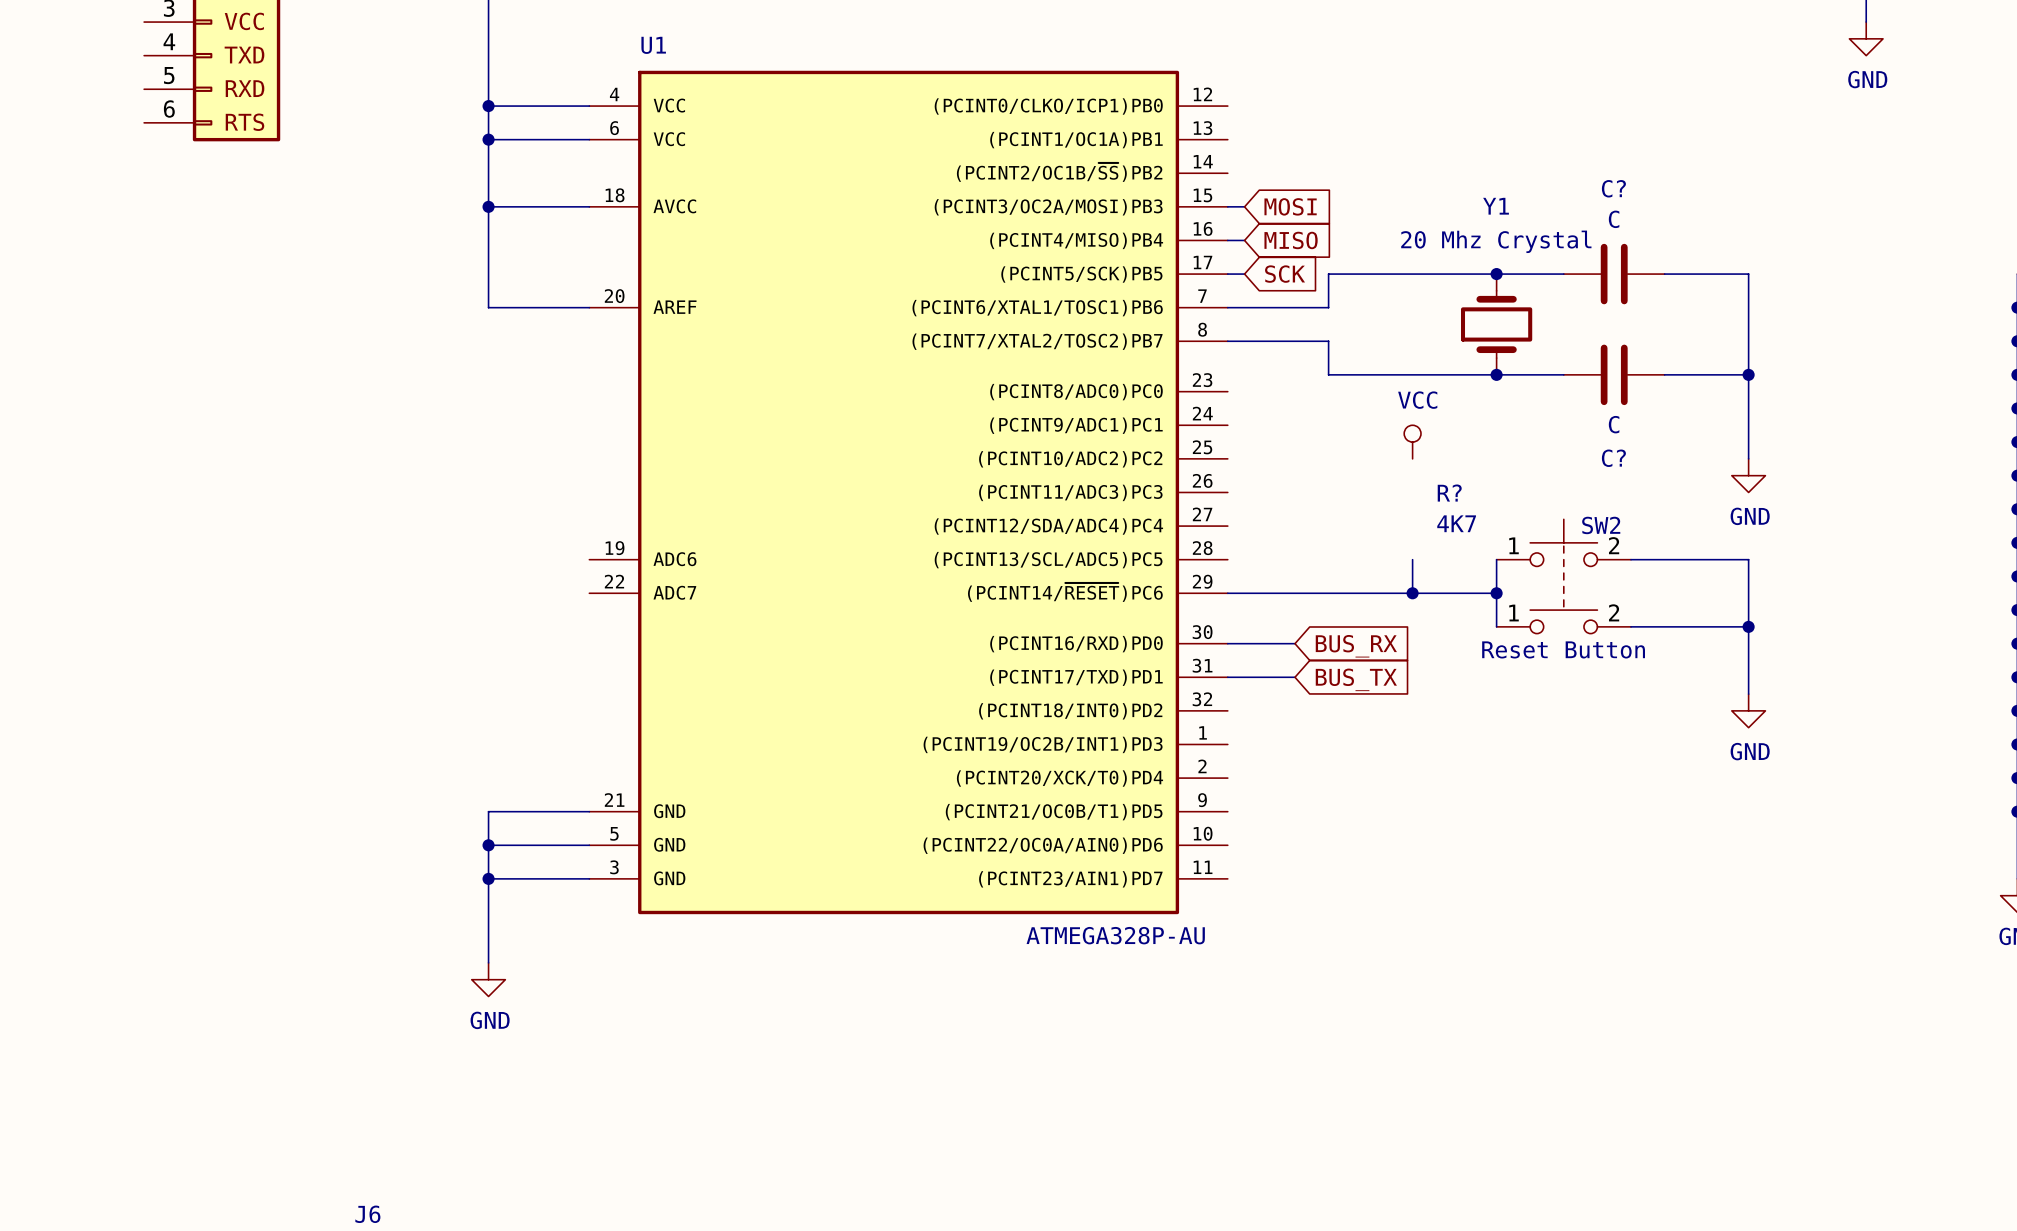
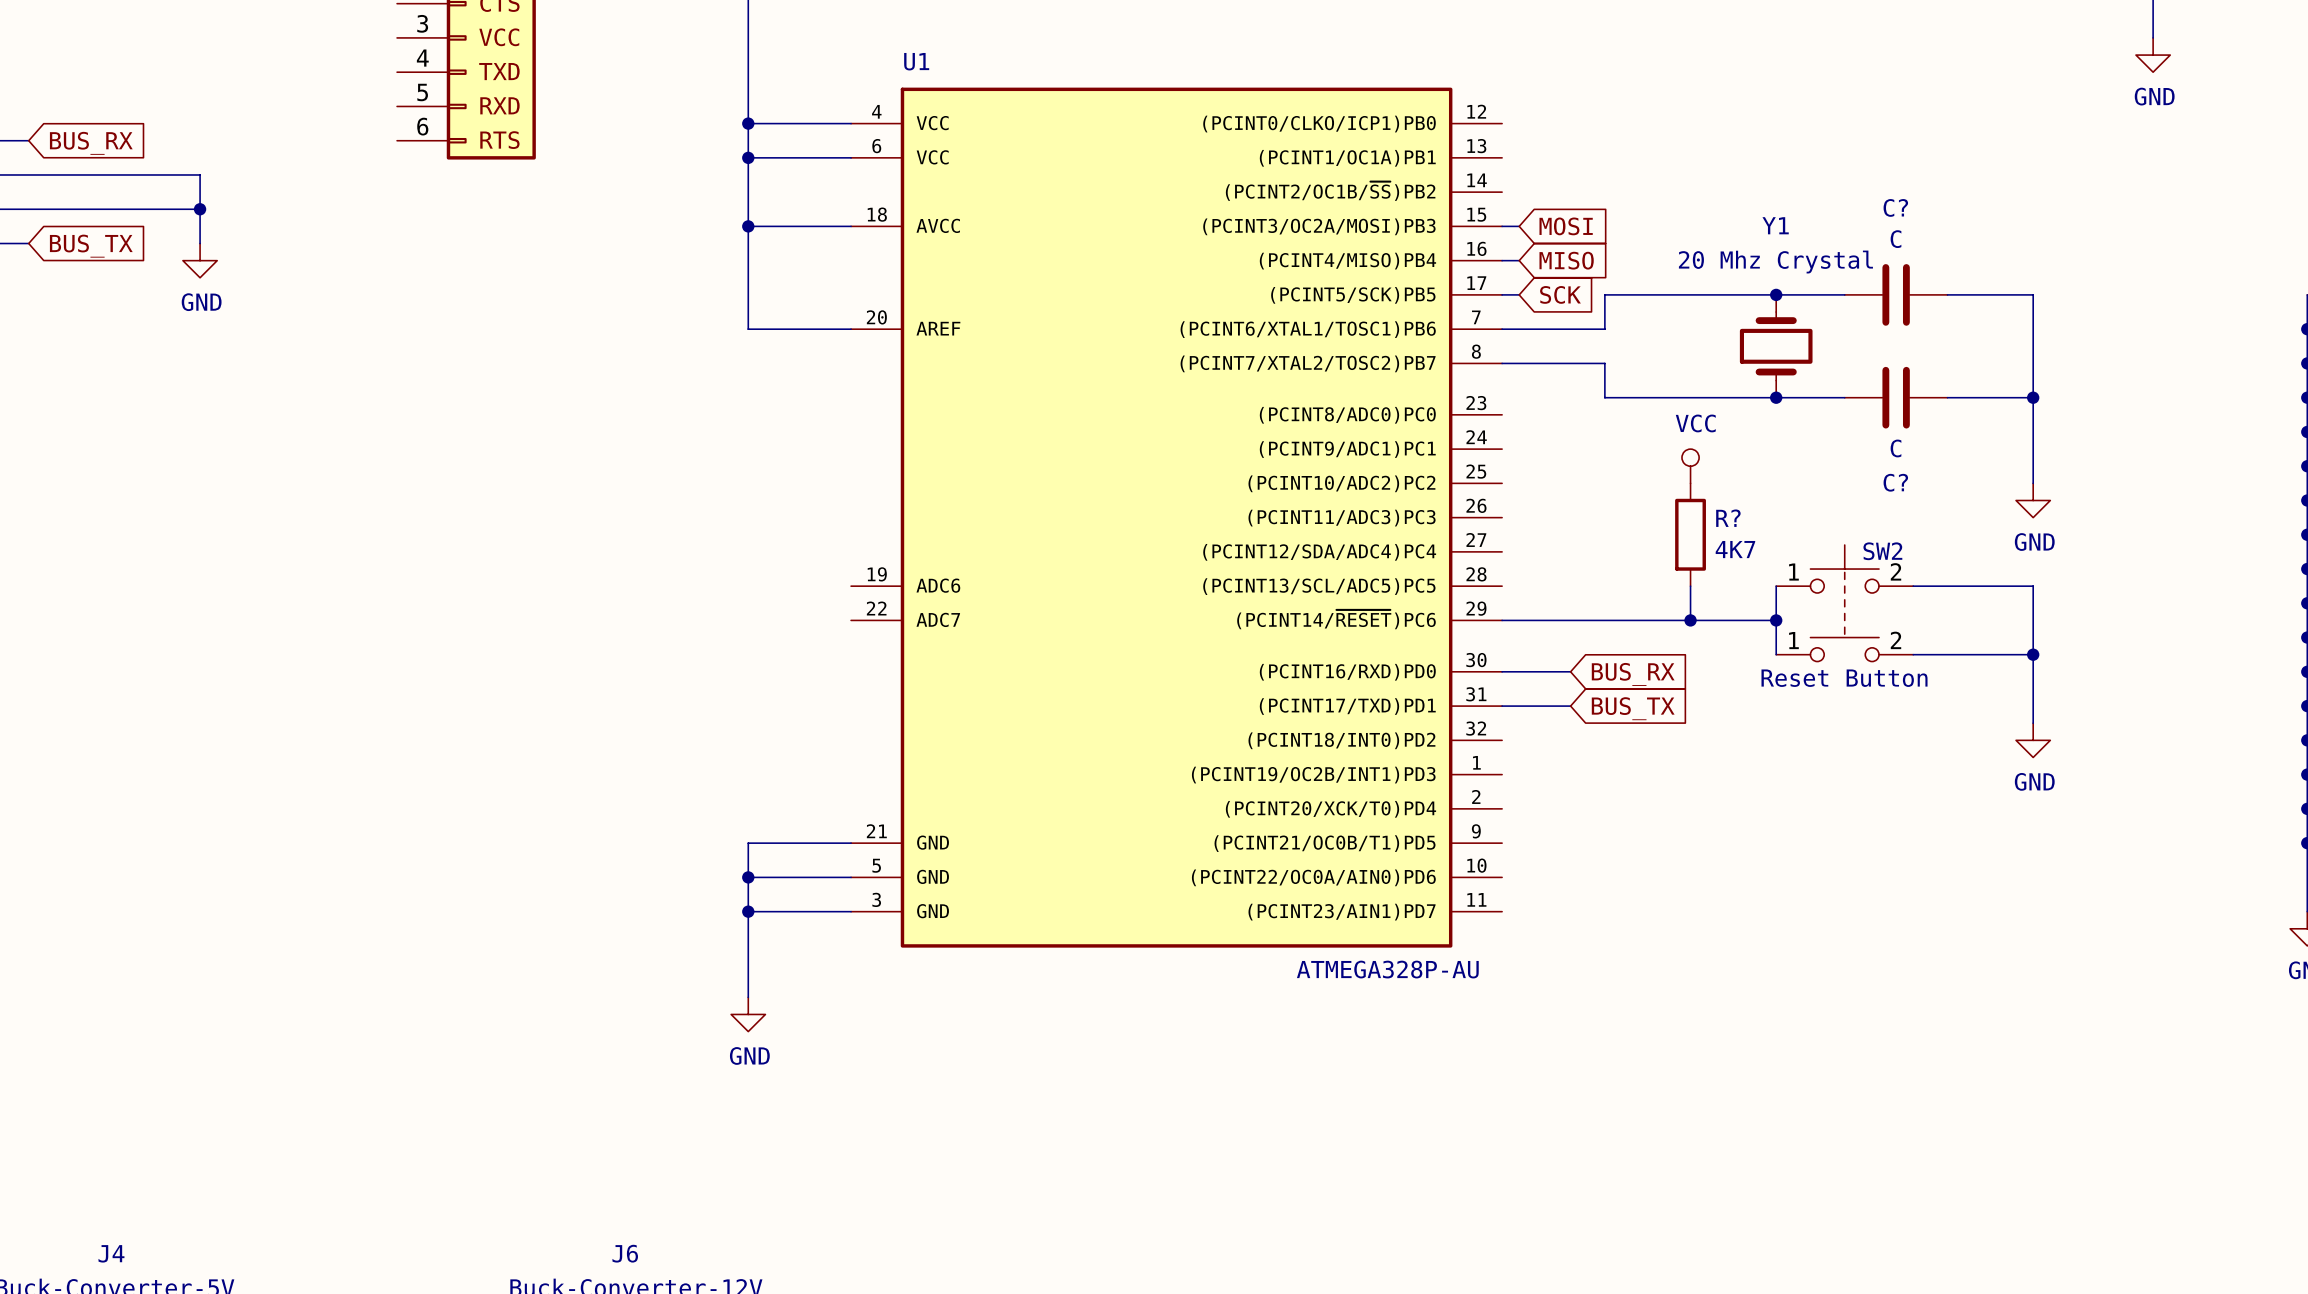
R?: none -> 4K7 (1690, 534)

